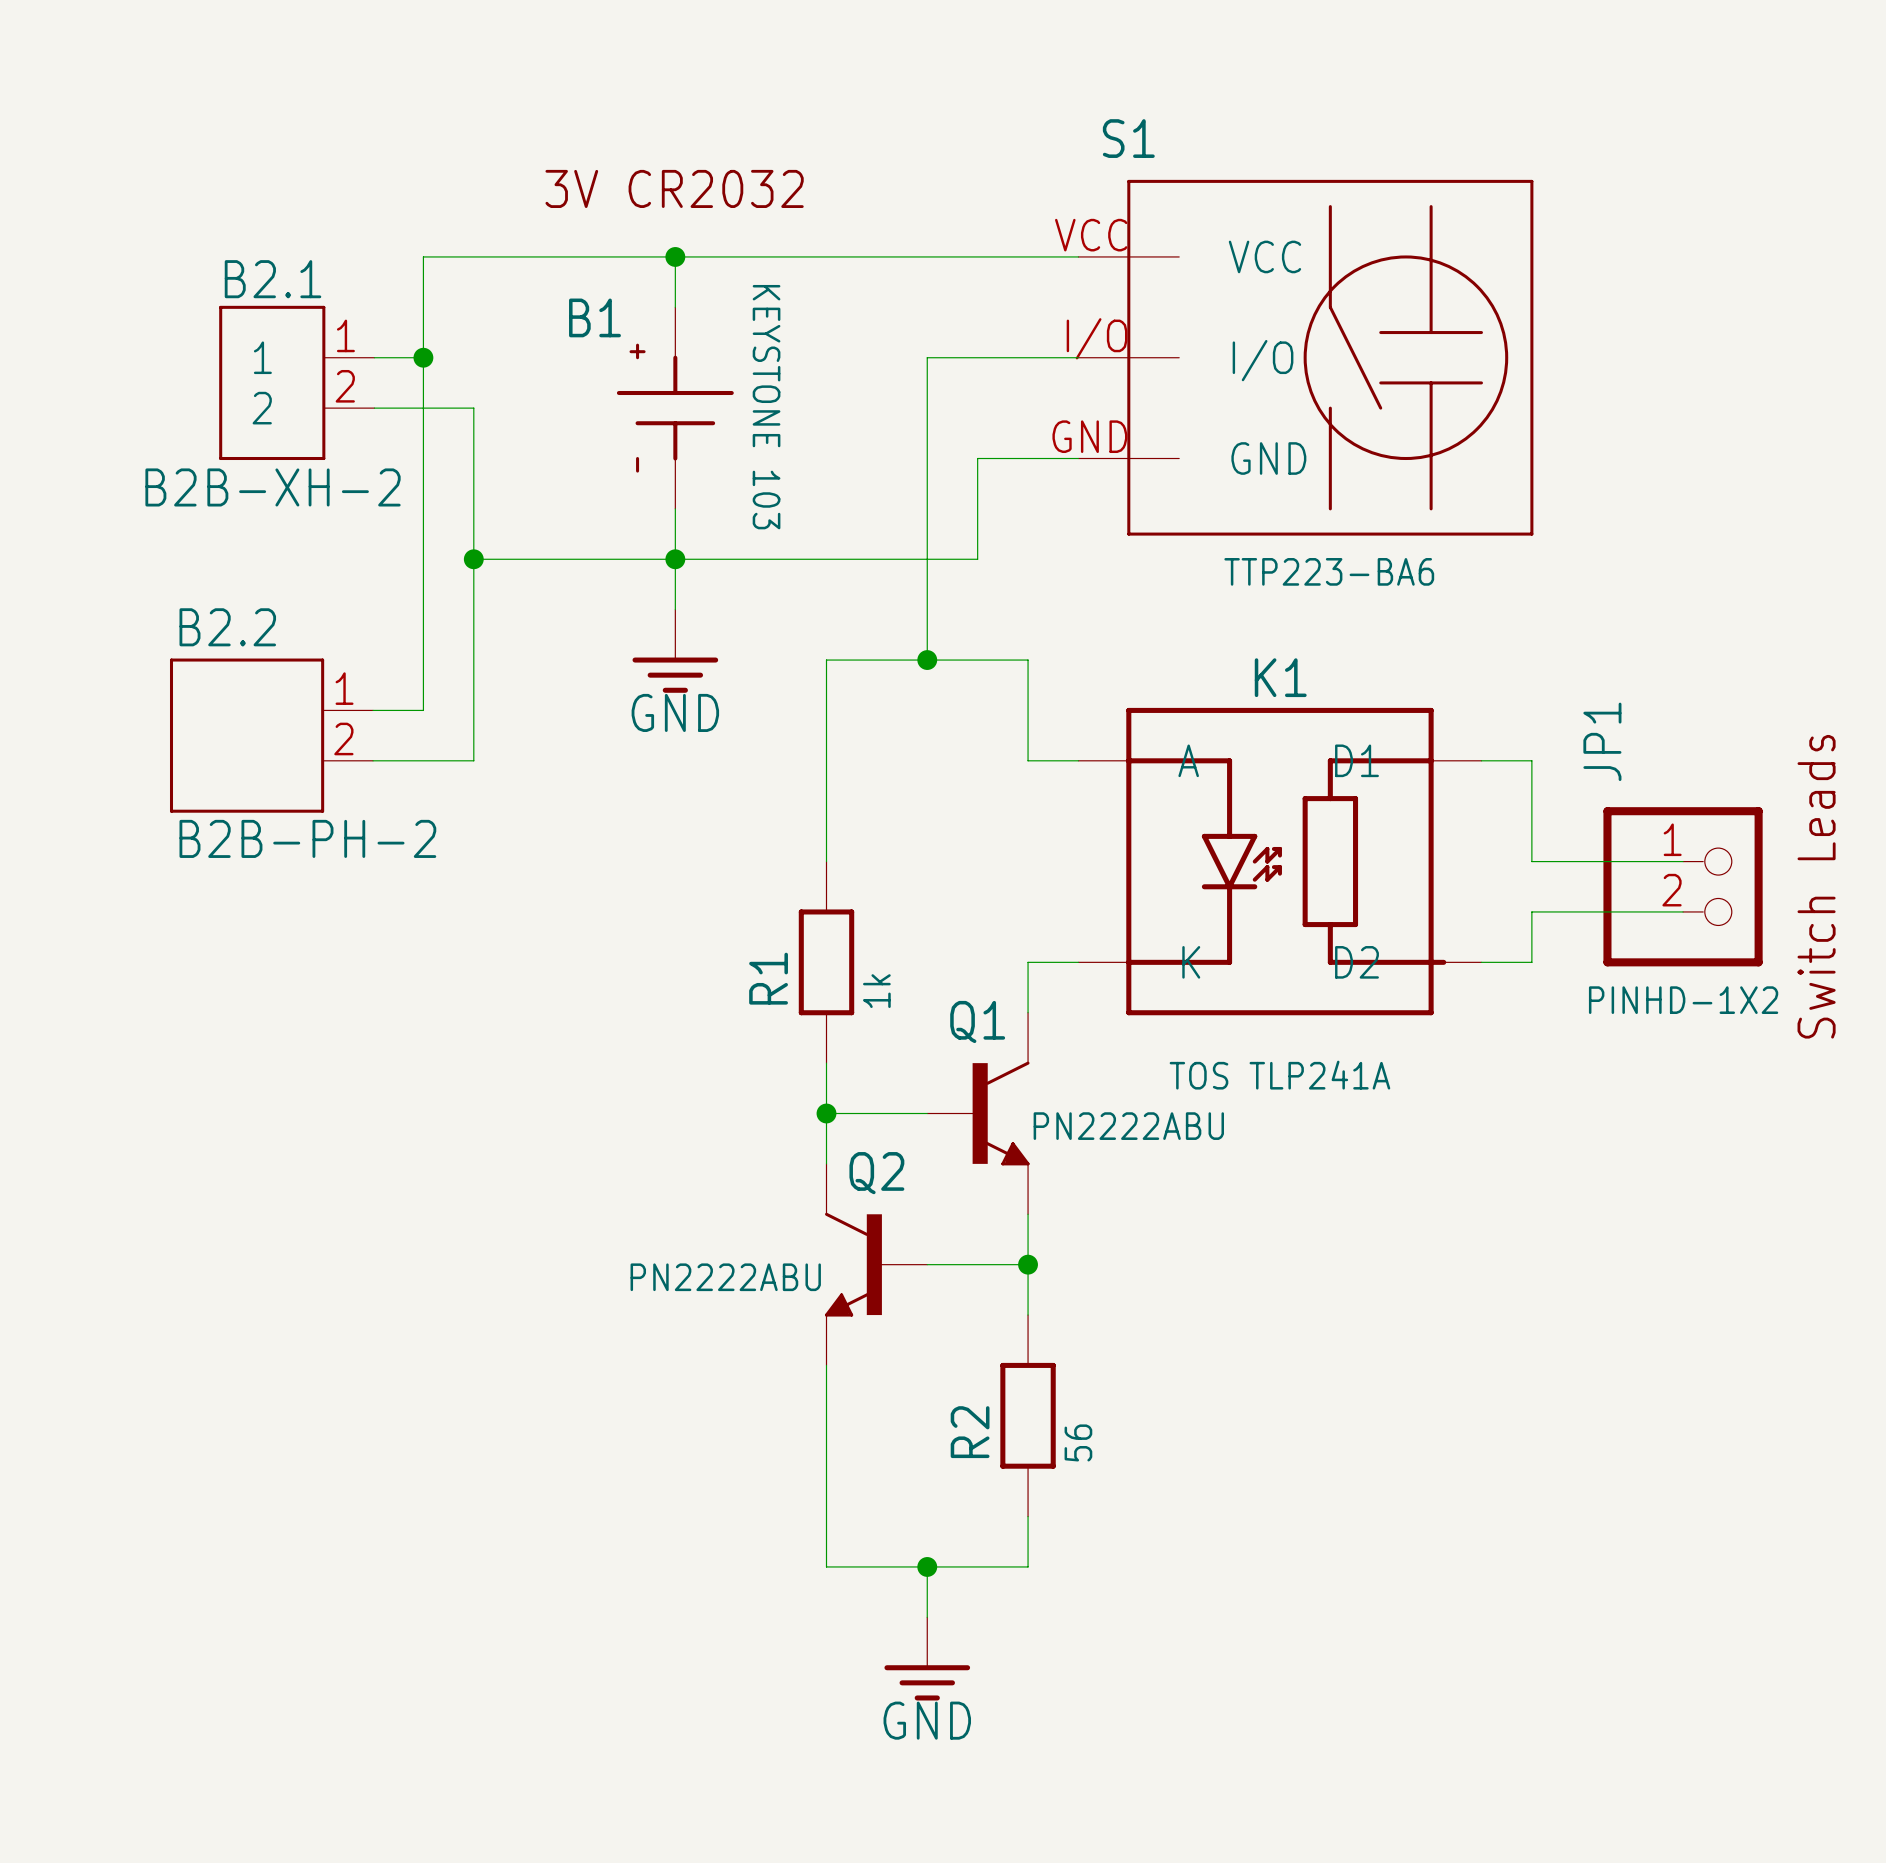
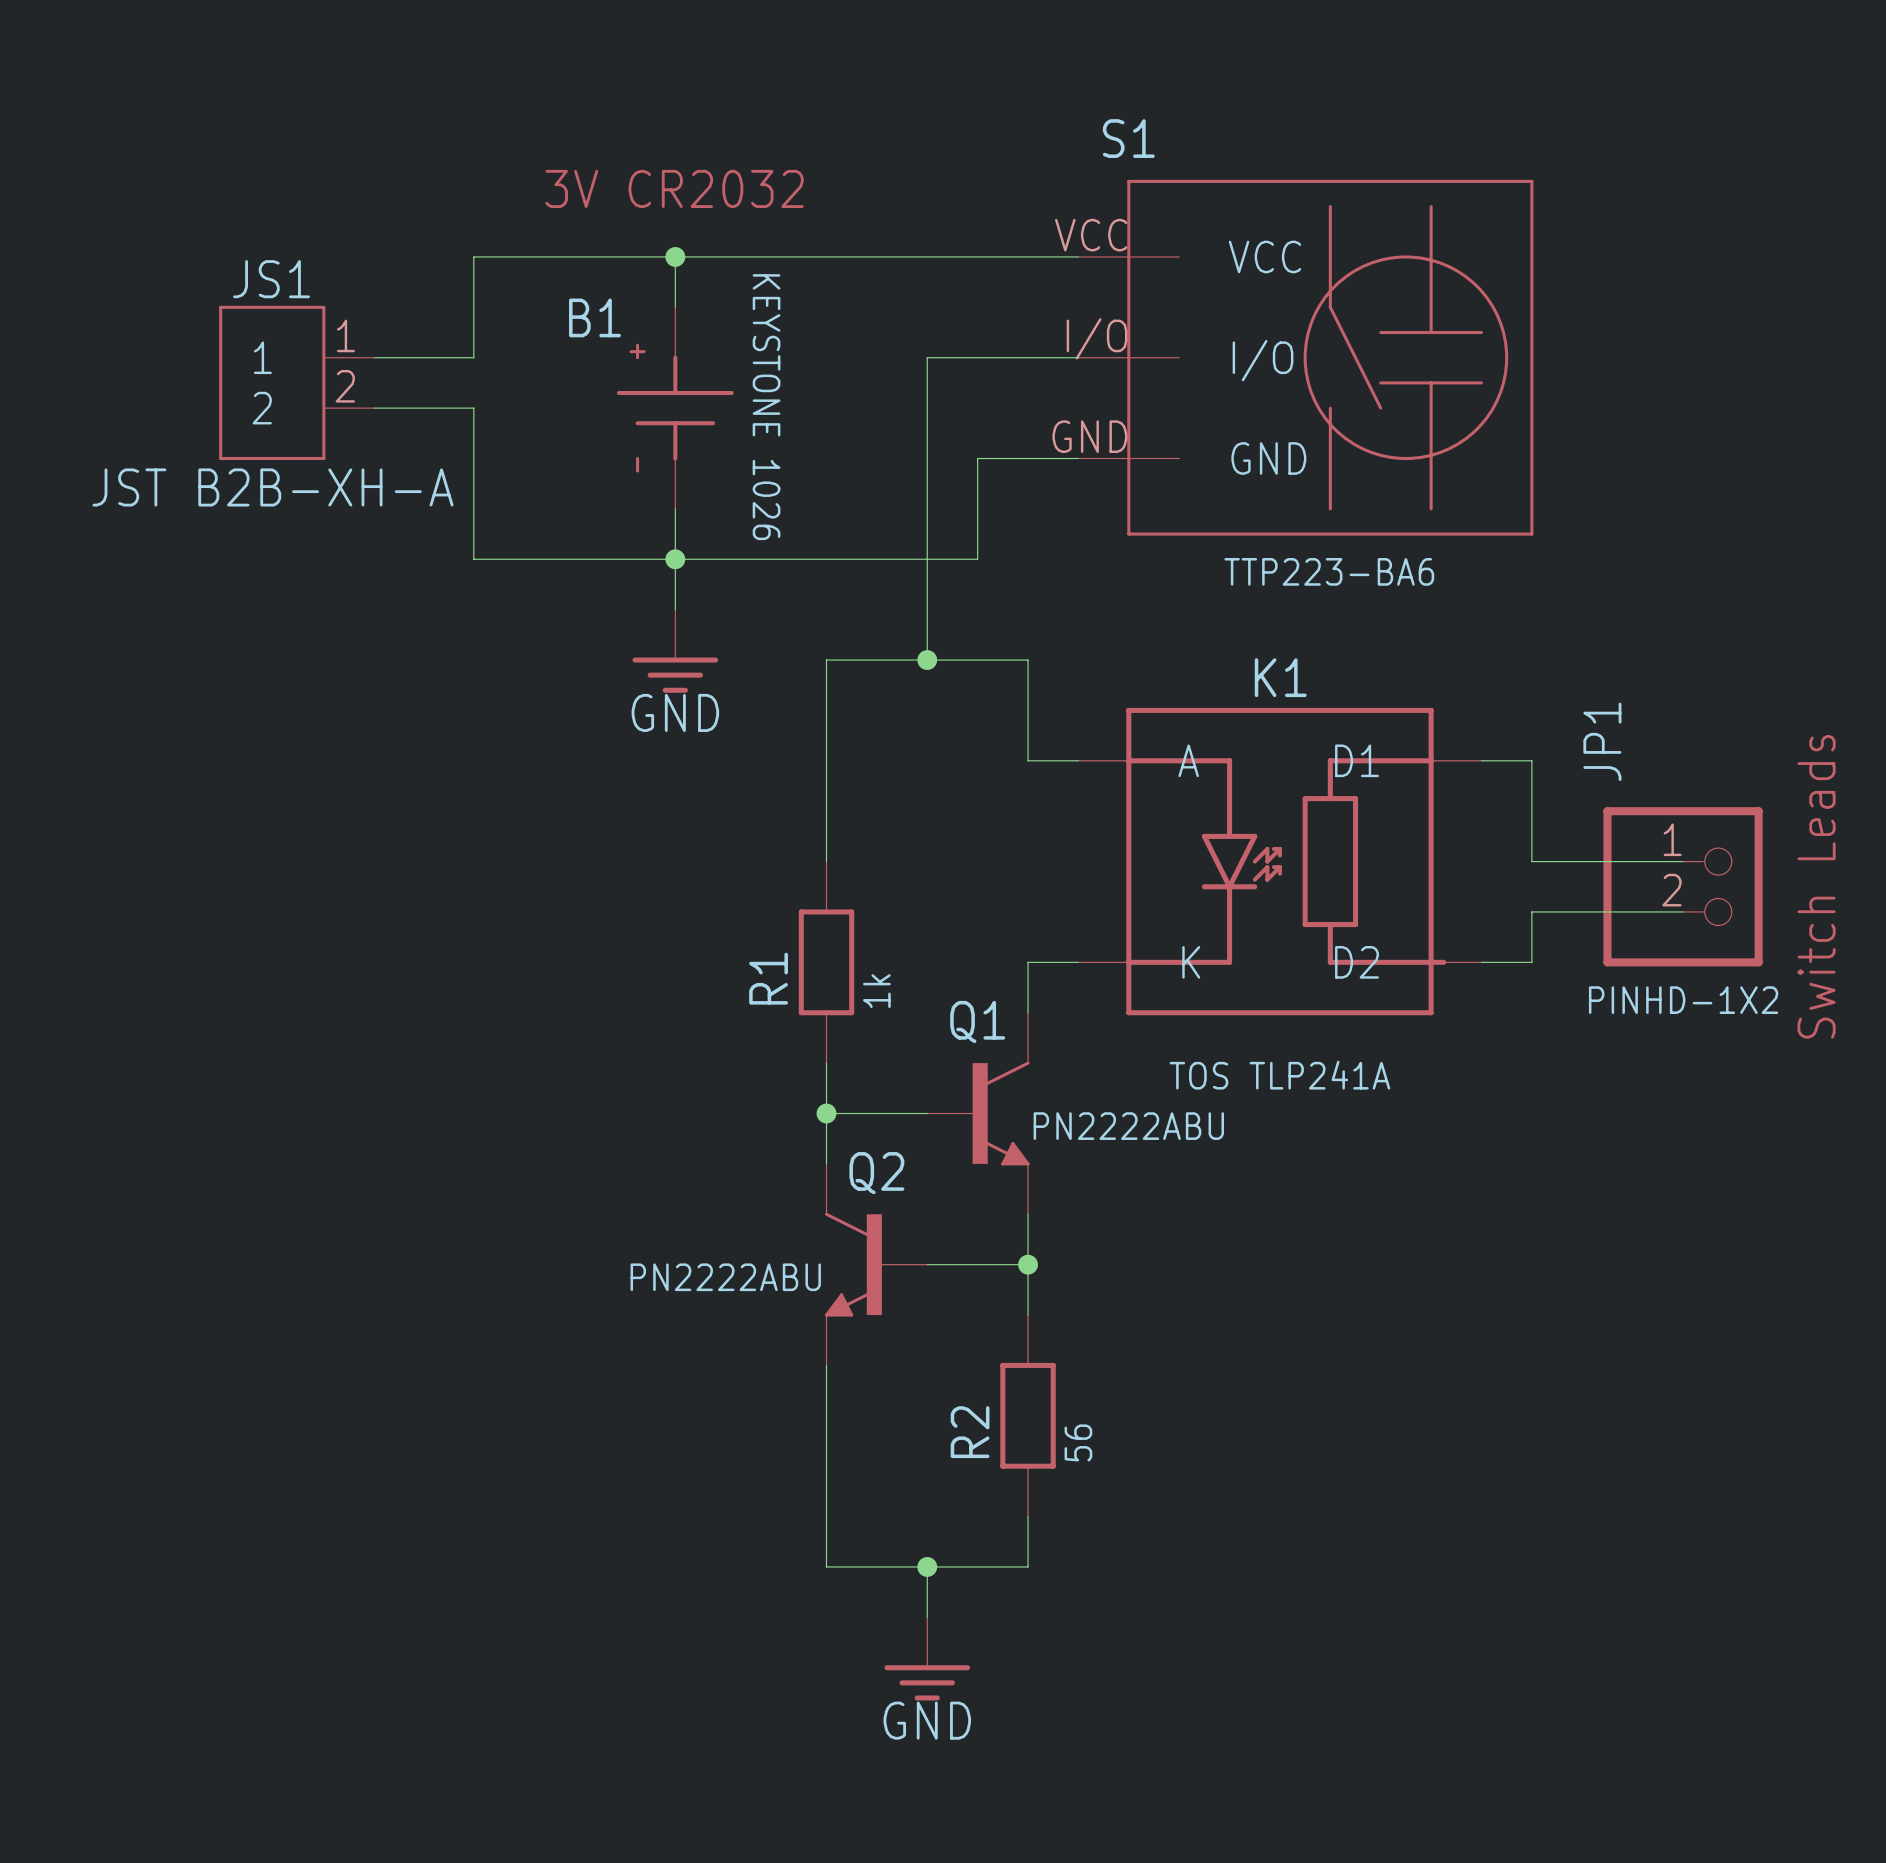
wire: (473, 256) (423, 256) (423, 710) (373, 710) -> (473, 256) (473, 357) (423, 357)
B2.1 name: B2.1 (273, 279) -> JS1 (271, 279)
junction: (423, 357) -> none
B1 value: KEYSTONE 103 (766, 407) -> KEYSTONE 1026 (766, 407)
B2.1 value: B2B-XH-2 (273, 487) -> JST B2B-XH-A (273, 487)
wire: (473, 559) (473, 760) (373, 760) -> none
junction: (473, 559) -> none
B2.2: B2B-PH-2 (271, 735) -> none

